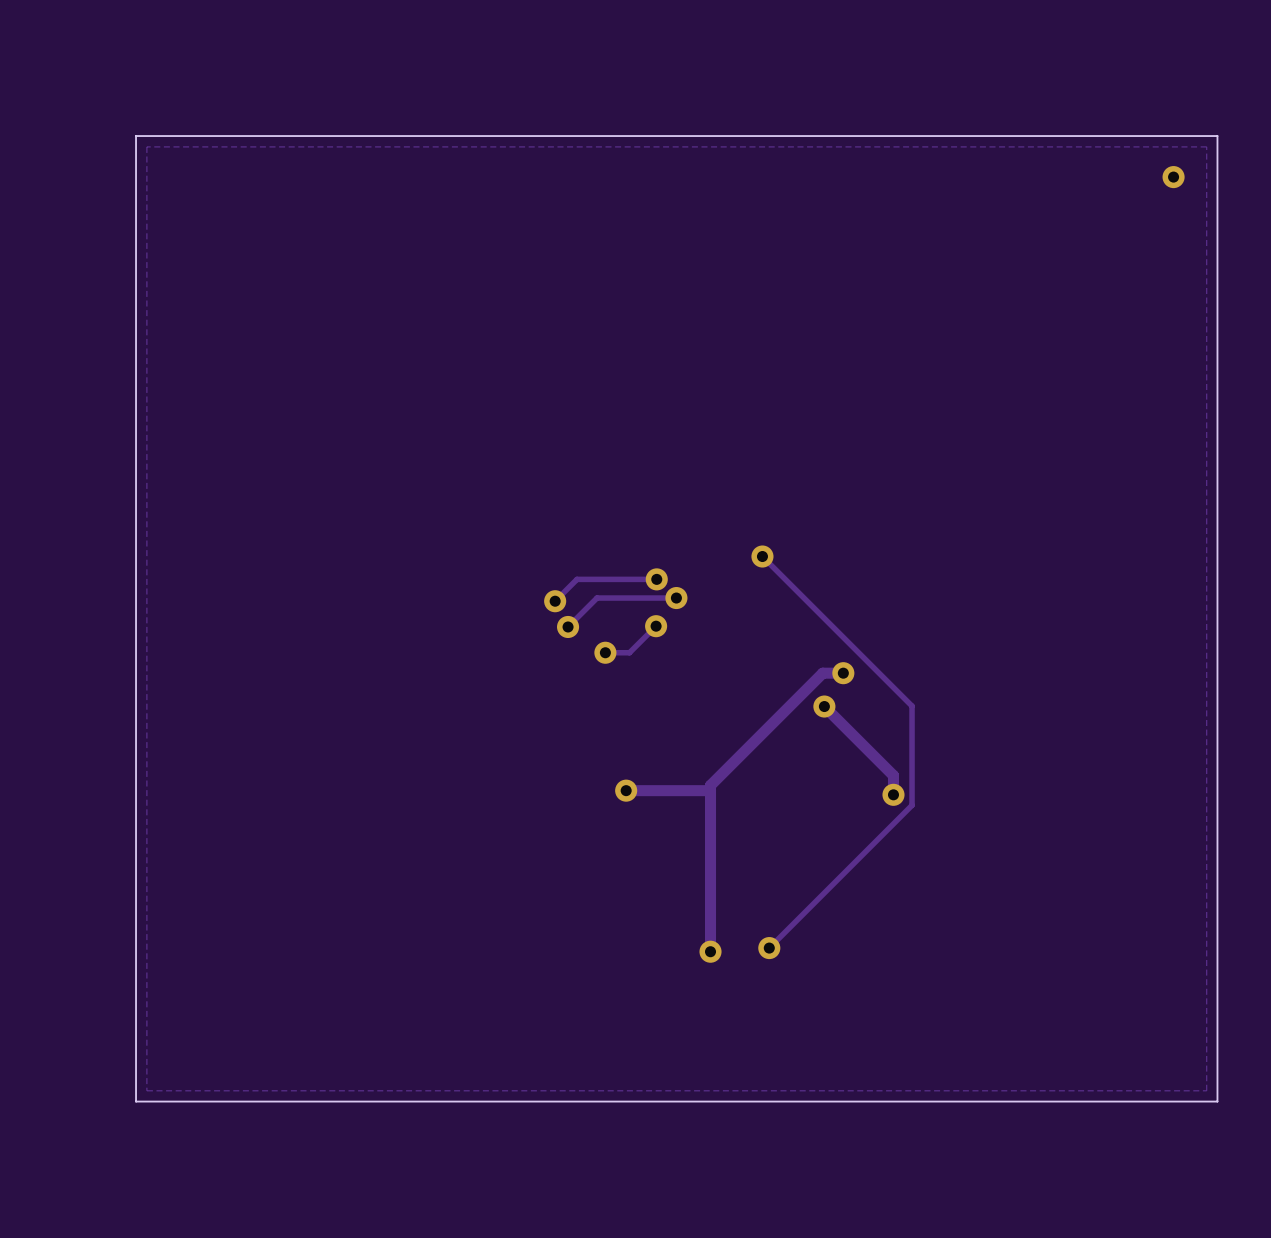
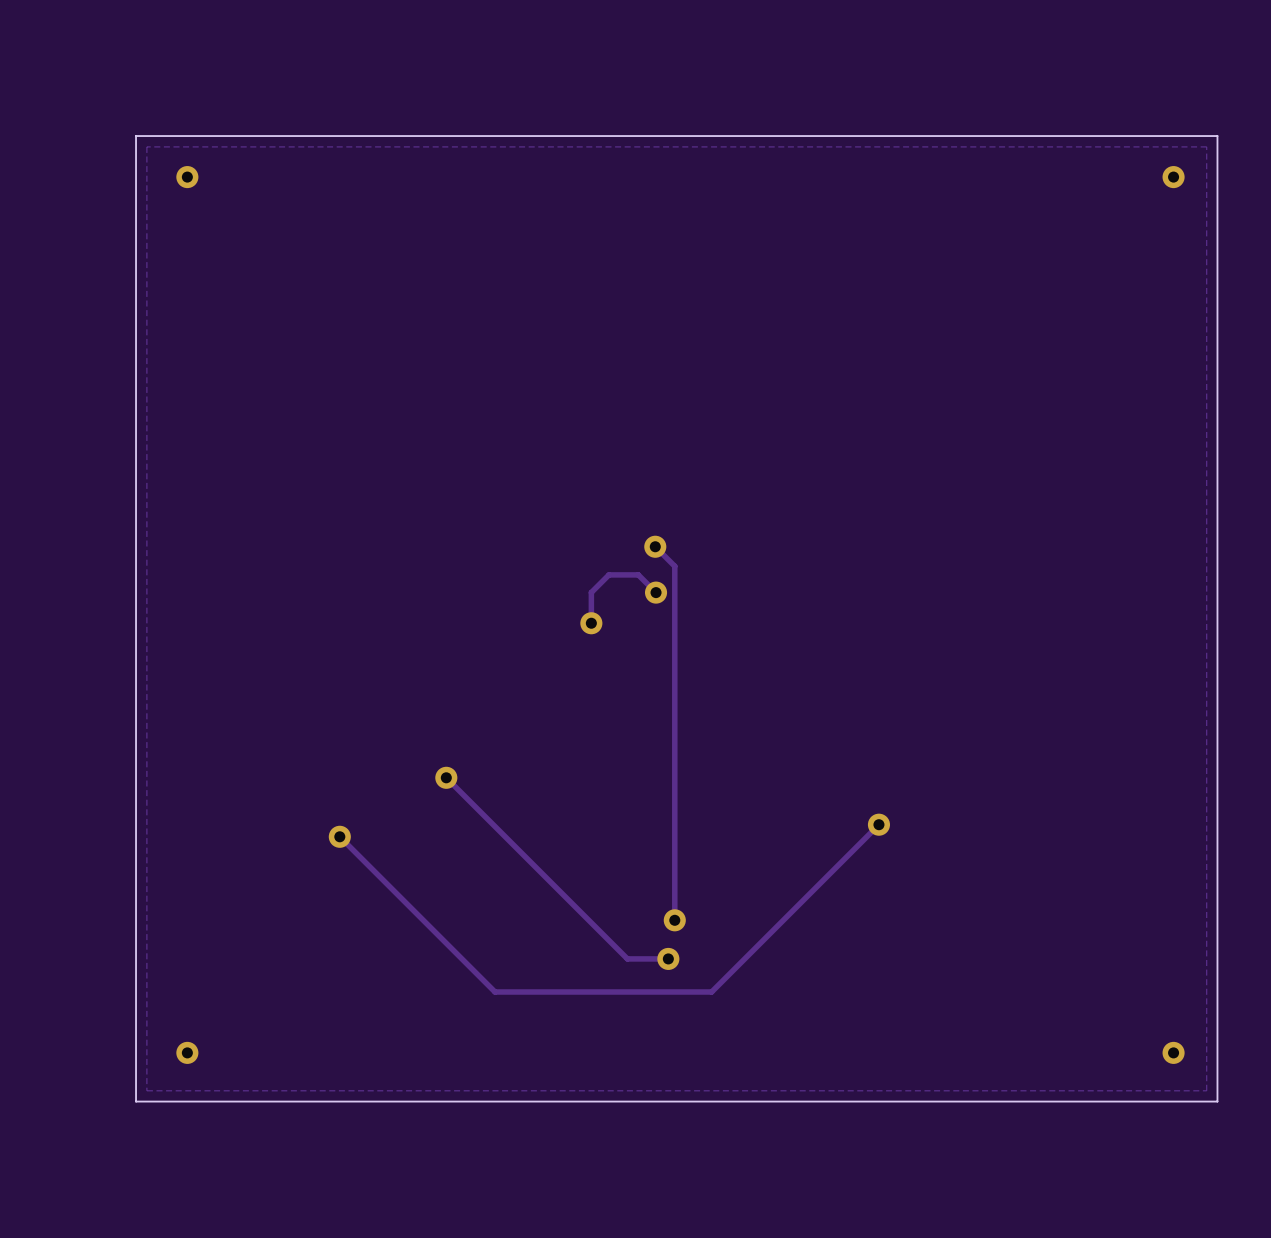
via: none -> (187, 177)
track: none -> (655, 546) (674, 566) (674, 920)
via: none -> (655, 546)
track: (762, 556) (912, 706) (912, 805) (769, 948) -> none
via: (762, 556) -> none
track: (656, 579) (577, 579) (555, 601) -> none
via: (656, 579) -> none
track: none -> (656, 592) (638, 574) (608, 574) (591, 592) (591, 623)
via: none -> (656, 592)
track: (676, 598) (596, 598) (568, 626) -> none
via: (676, 598) -> none
via: (555, 601) -> none
via: none -> (591, 623)
via: (568, 626) -> none
track: (656, 626) (629, 652) (605, 652) -> none
via: (656, 626) -> none
via: (605, 652) -> none
track: (843, 673) (822, 673) (710, 785) (710, 951) -> none
via: (843, 673) -> none
track: (824, 706) (893, 775) (893, 794) -> none
via: (824, 706) -> none
track: none -> (446, 777) (627, 958) (668, 958)
via: none -> (446, 777)
via: (626, 790) -> none
track: (710, 790) (626, 790) -> none
via position: (893, 794) -> (878, 824)
track: none -> (878, 824) (711, 992) (495, 992) (339, 836)
via: none -> (339, 836)
via: none -> (674, 920)
via: (769, 948) -> none
via: (710, 951) -> none
via: none -> (668, 958)
via: none -> (187, 1052)
via: none -> (1173, 1052)

